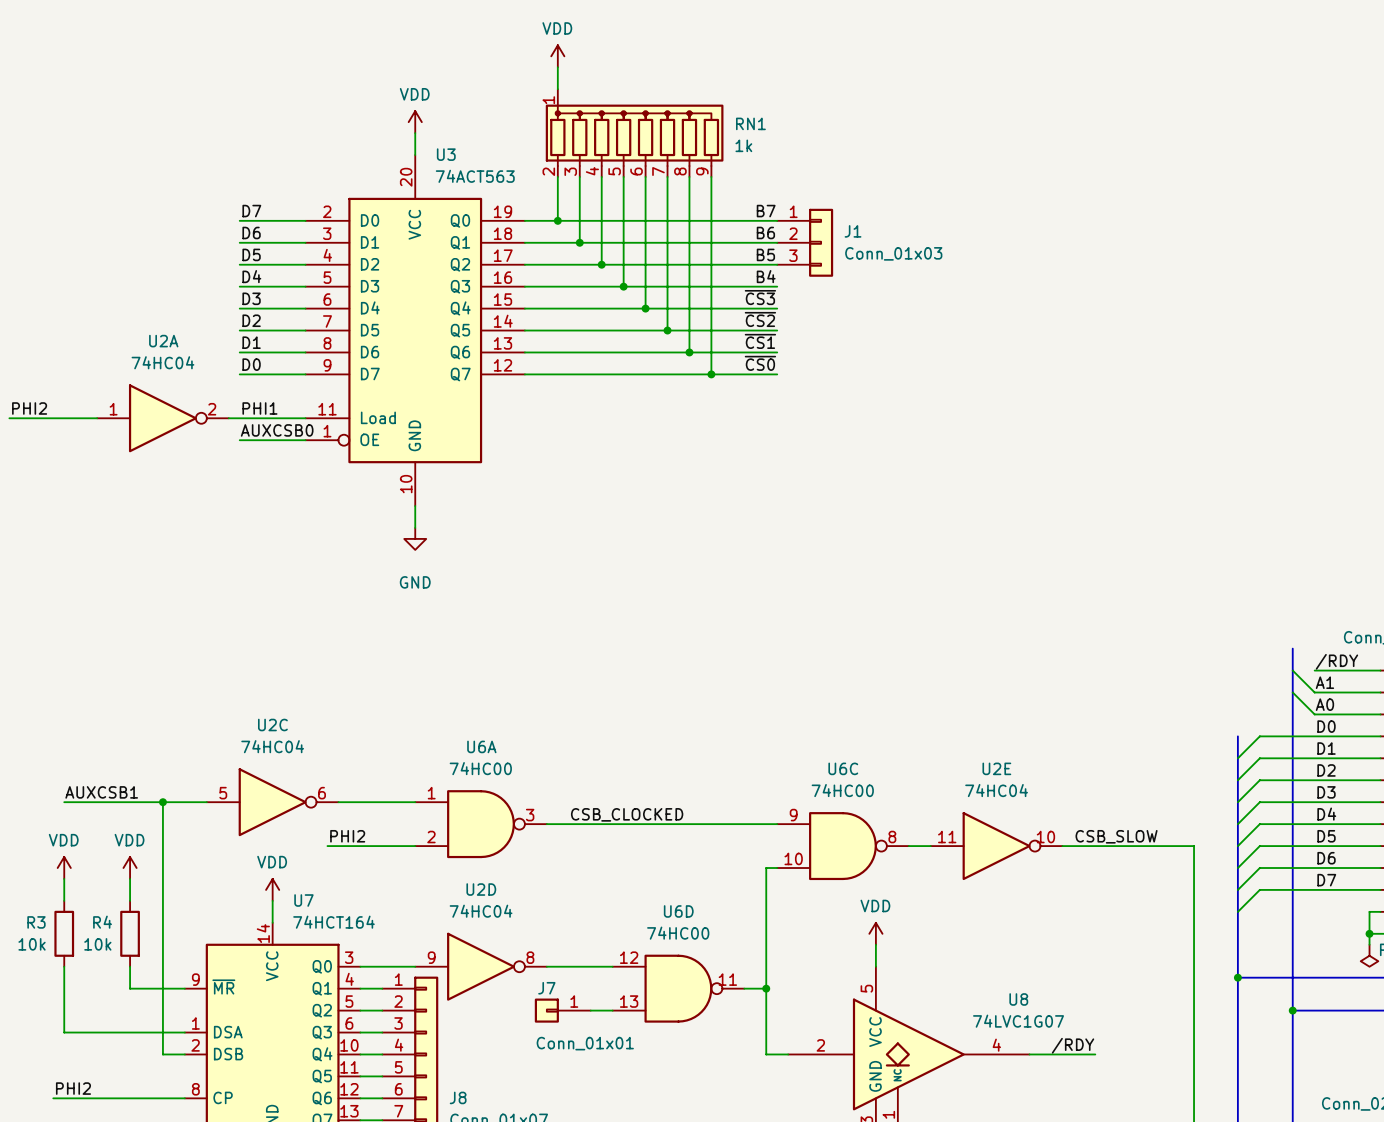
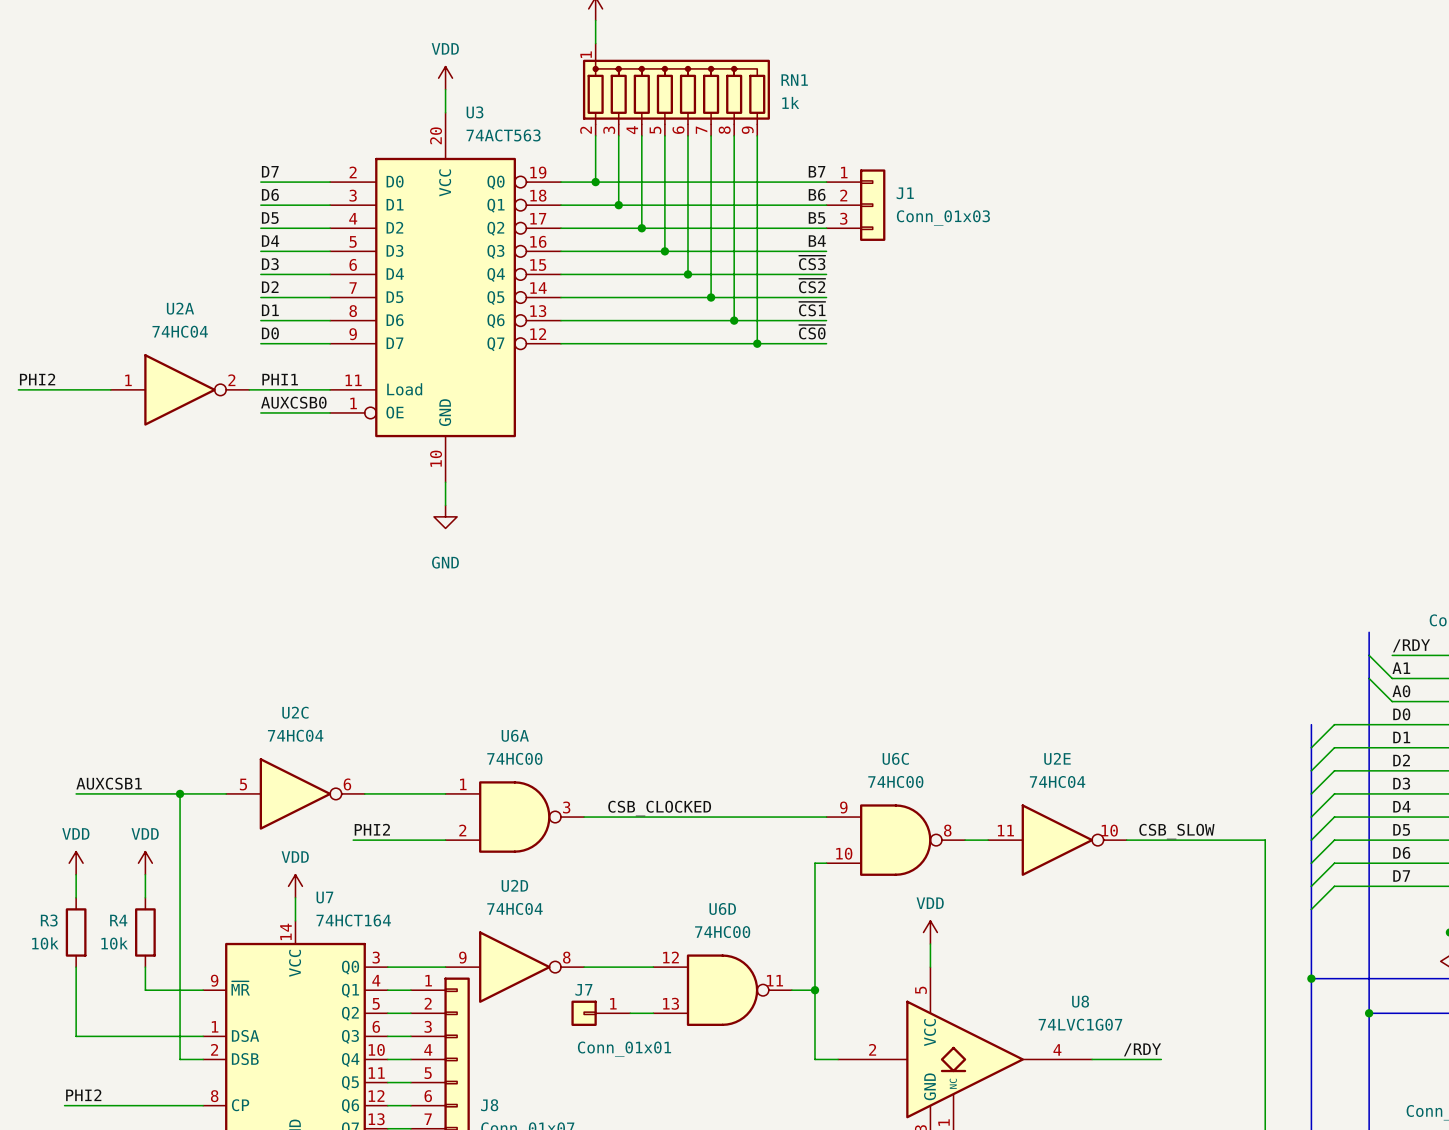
U3 symbol: [305, 155, 525, 507] -> [330, 112, 562, 483]

